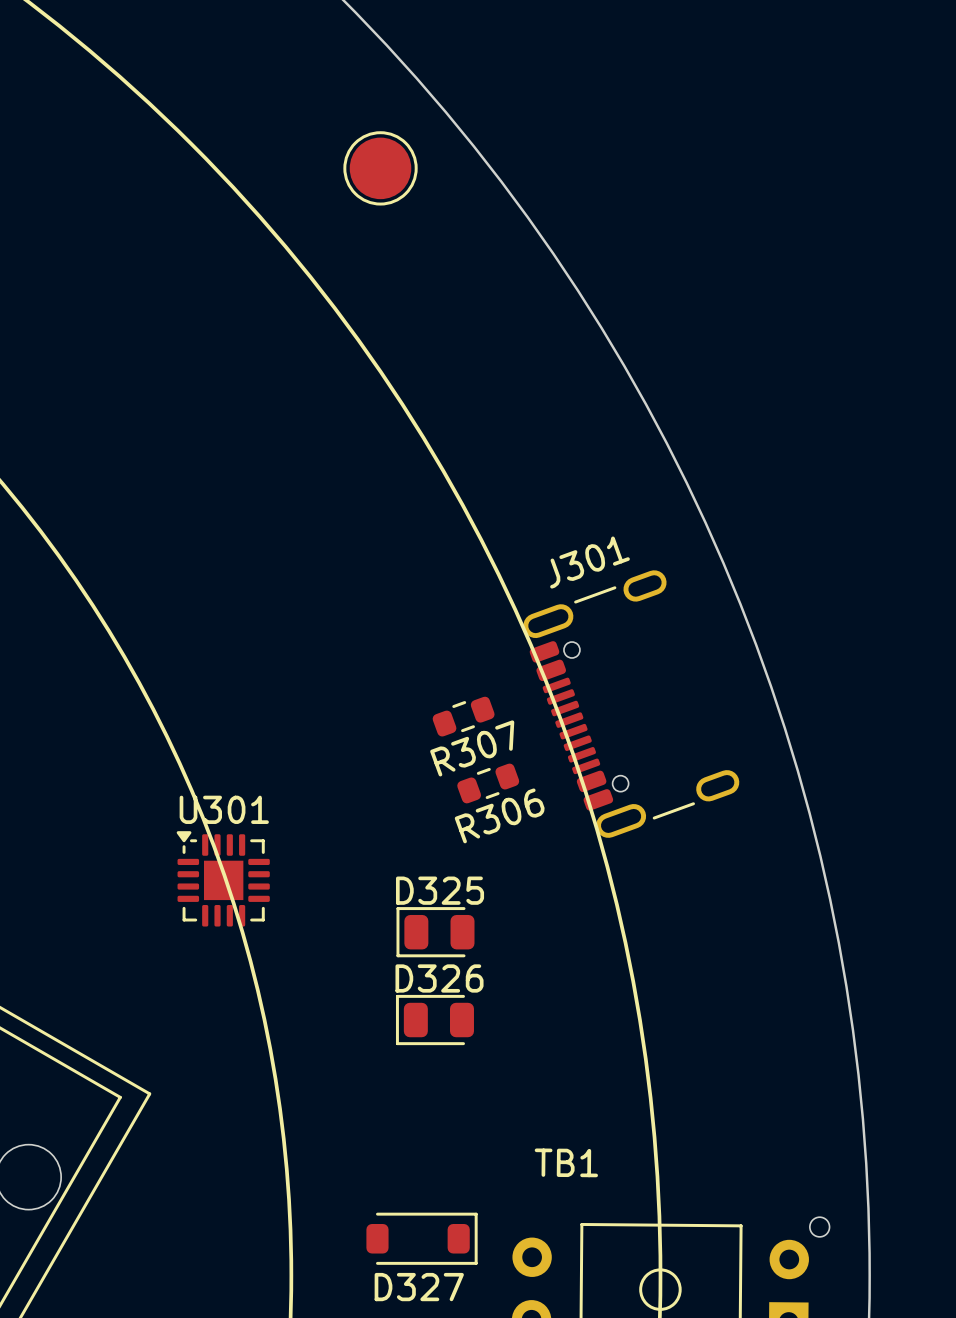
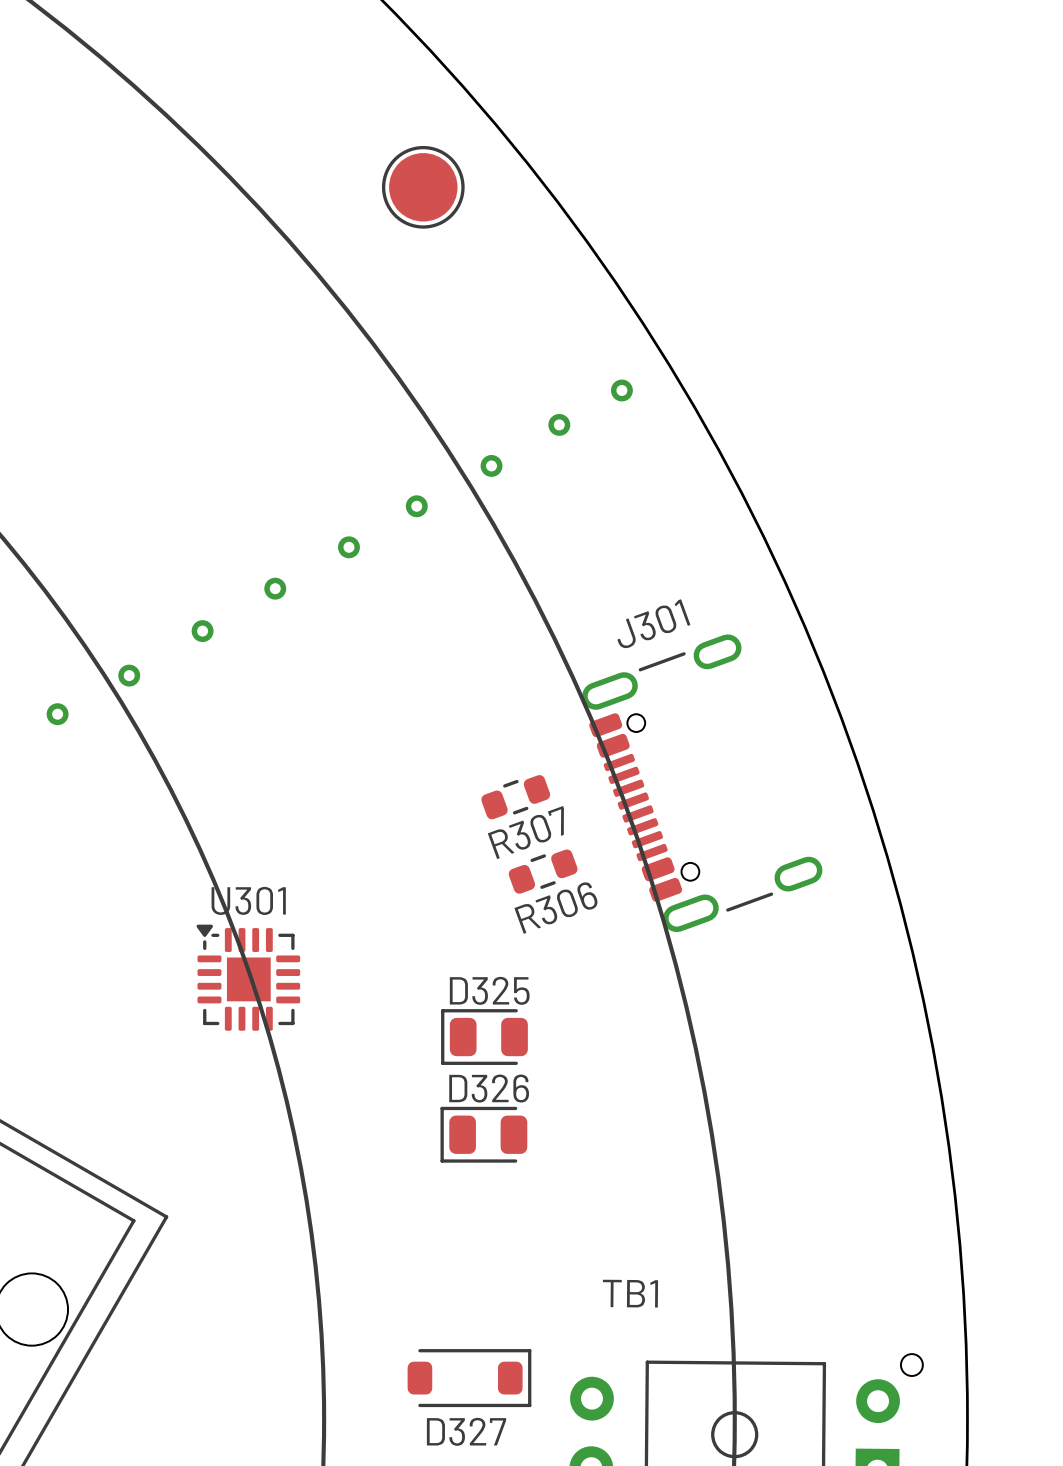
via: none -> (621, 390)
via: none -> (559, 424)
via: none -> (491, 465)
via: none -> (416, 506)
via: none -> (348, 547)
via: none -> (275, 588)
via: none -> (202, 631)
via: none -> (129, 675)
via: none -> (57, 714)

